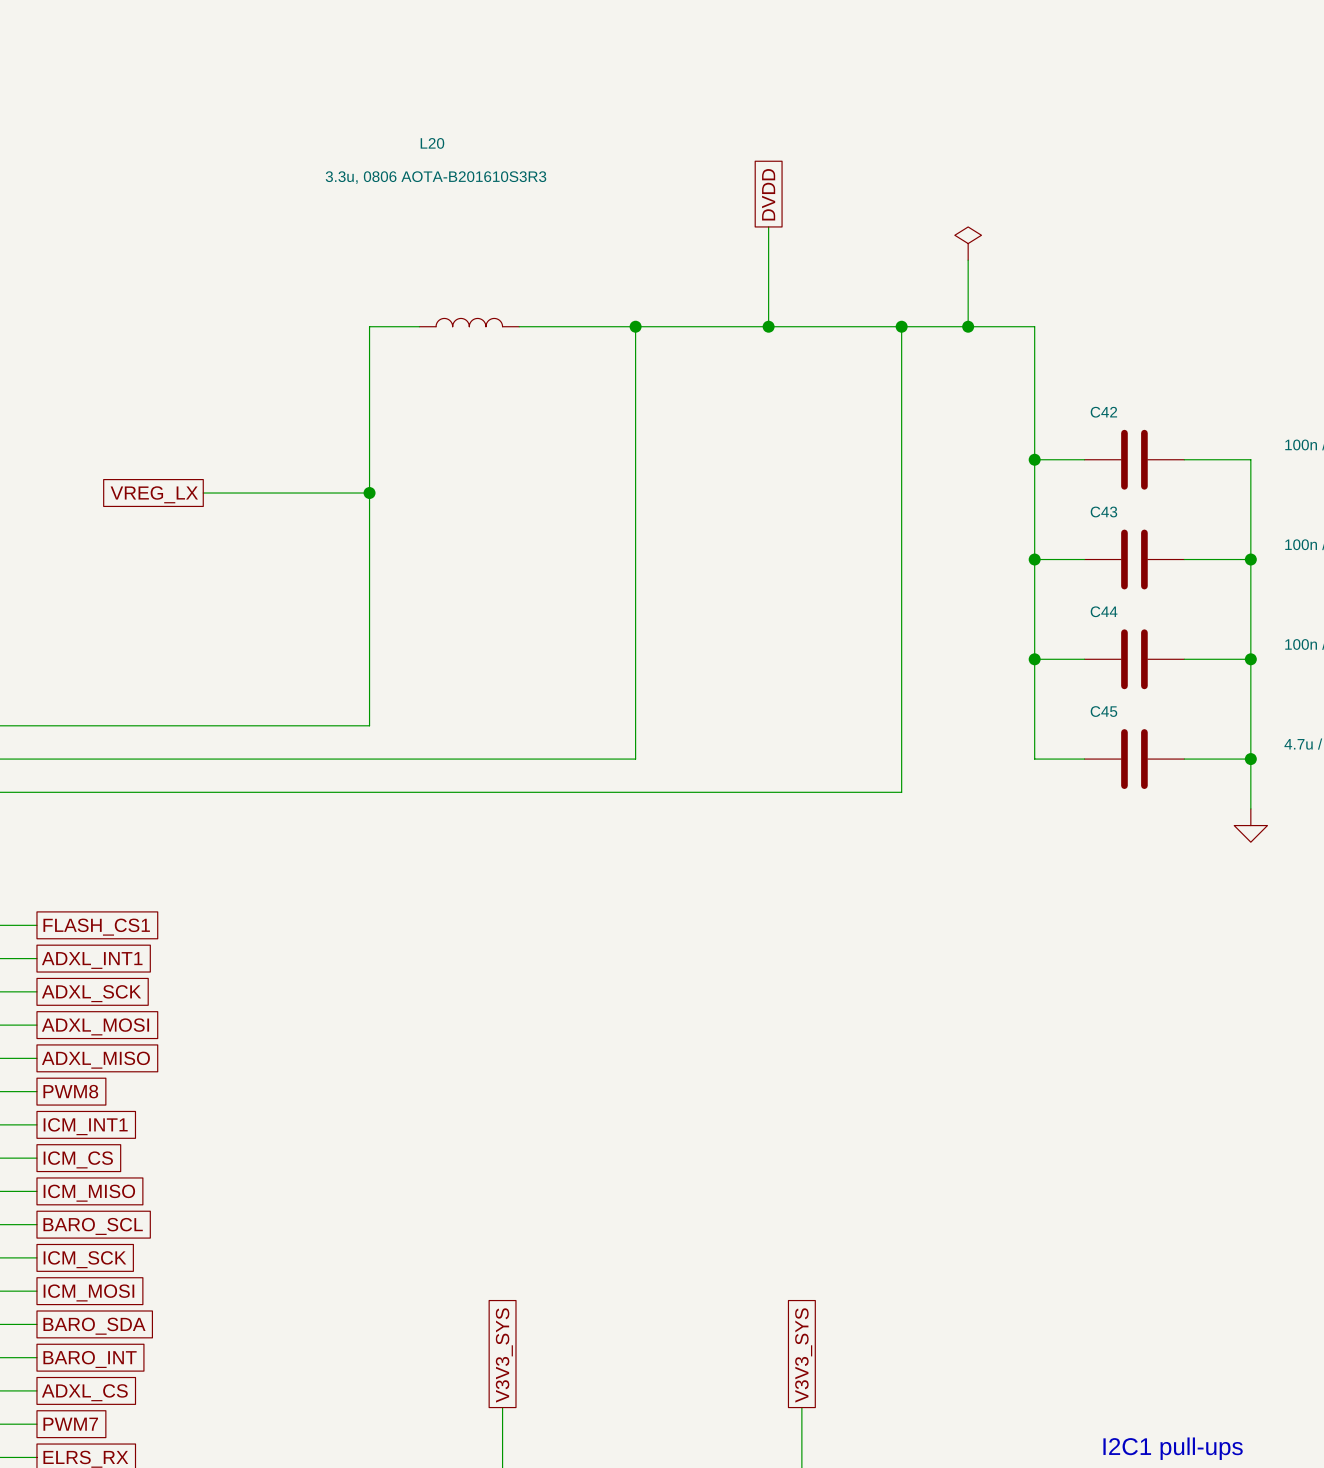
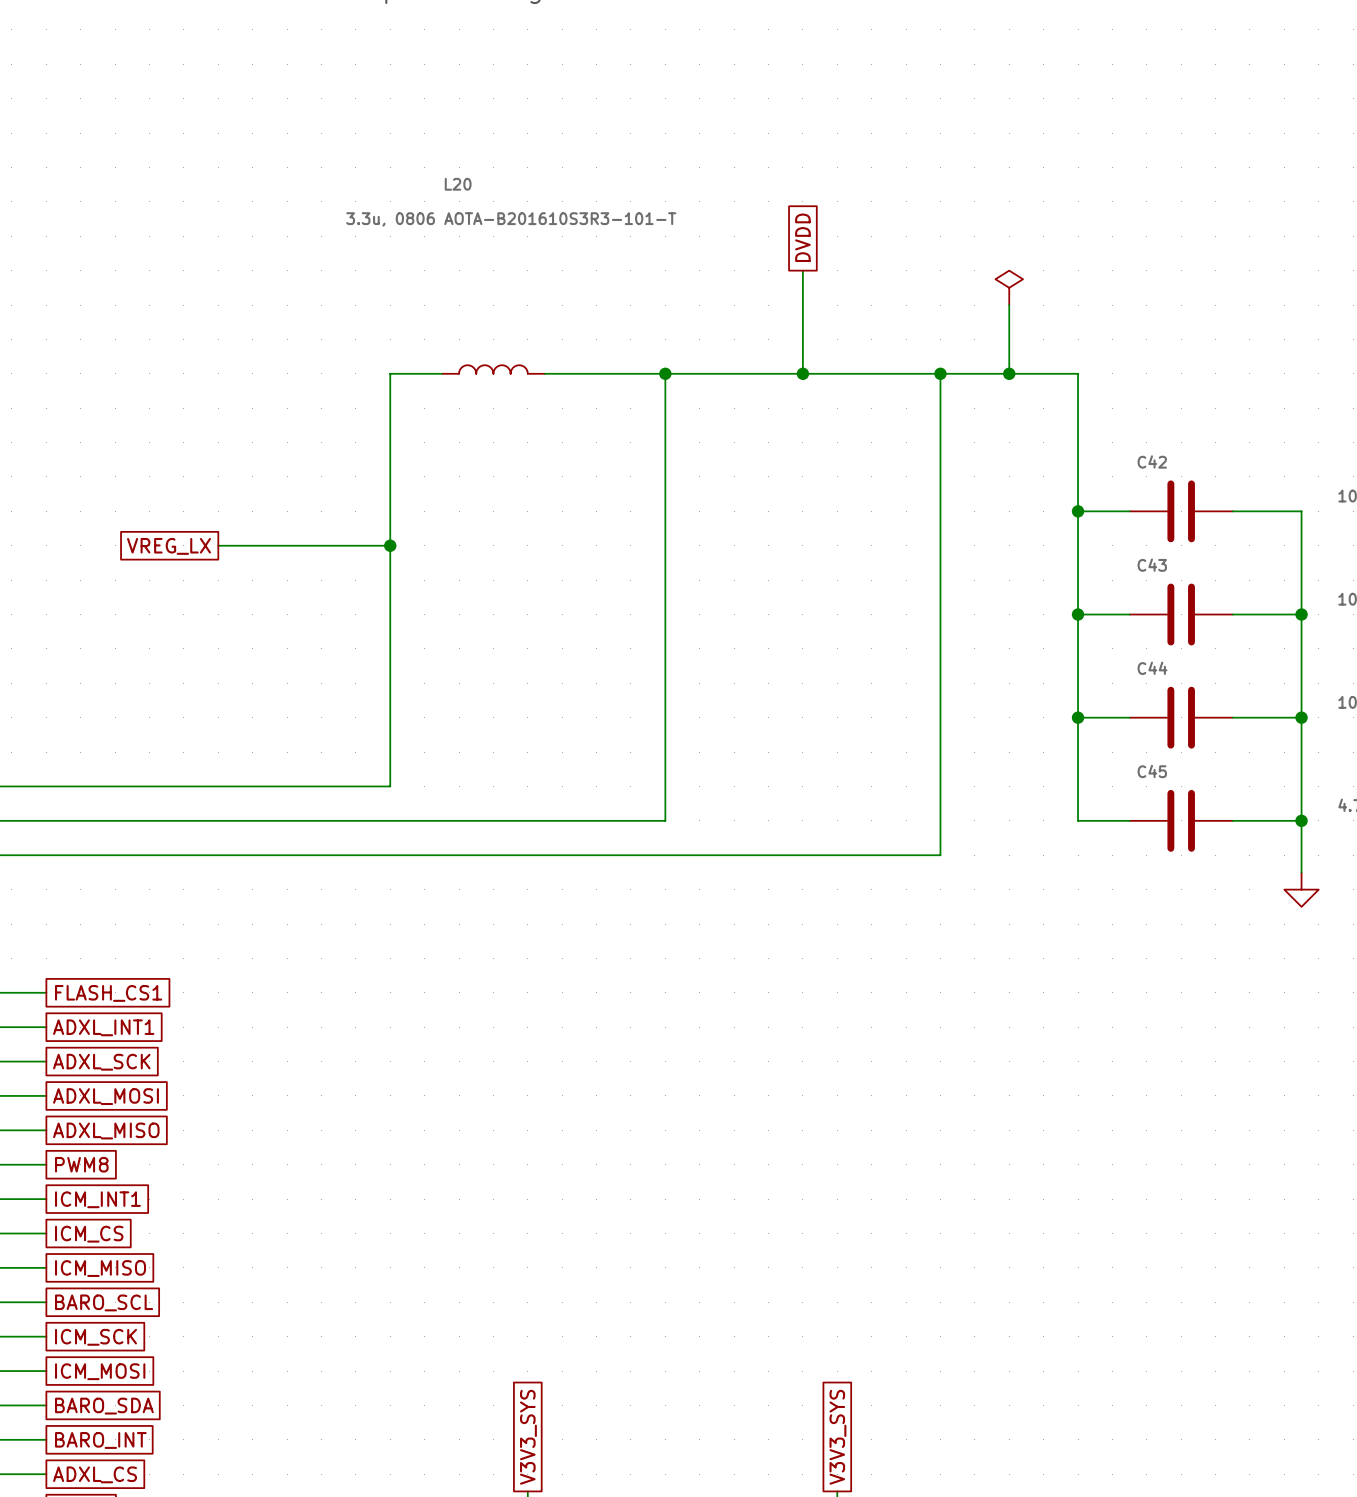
L20 value: 3.3u, 0806 AOTA-B201610S3R3 (435, 177) -> 3.3u, 0806 AOTA-B201610S3R3-101-T (511, 219)

